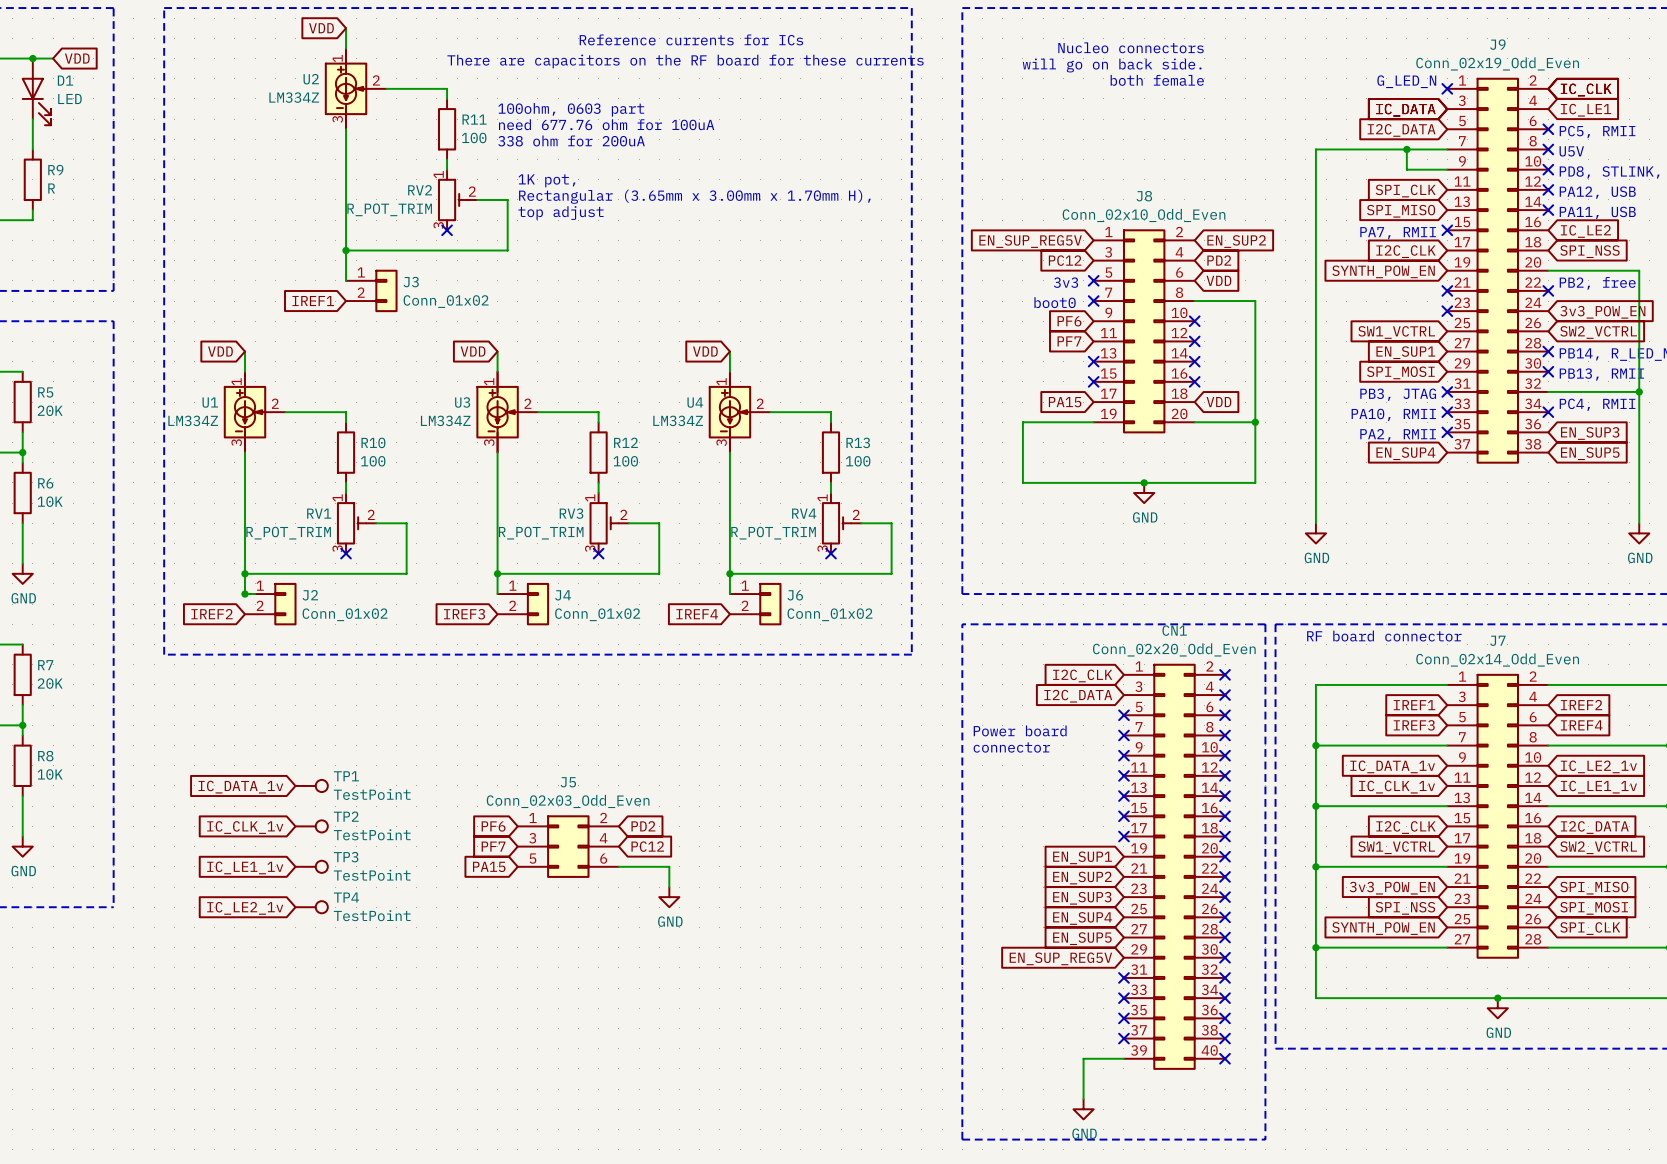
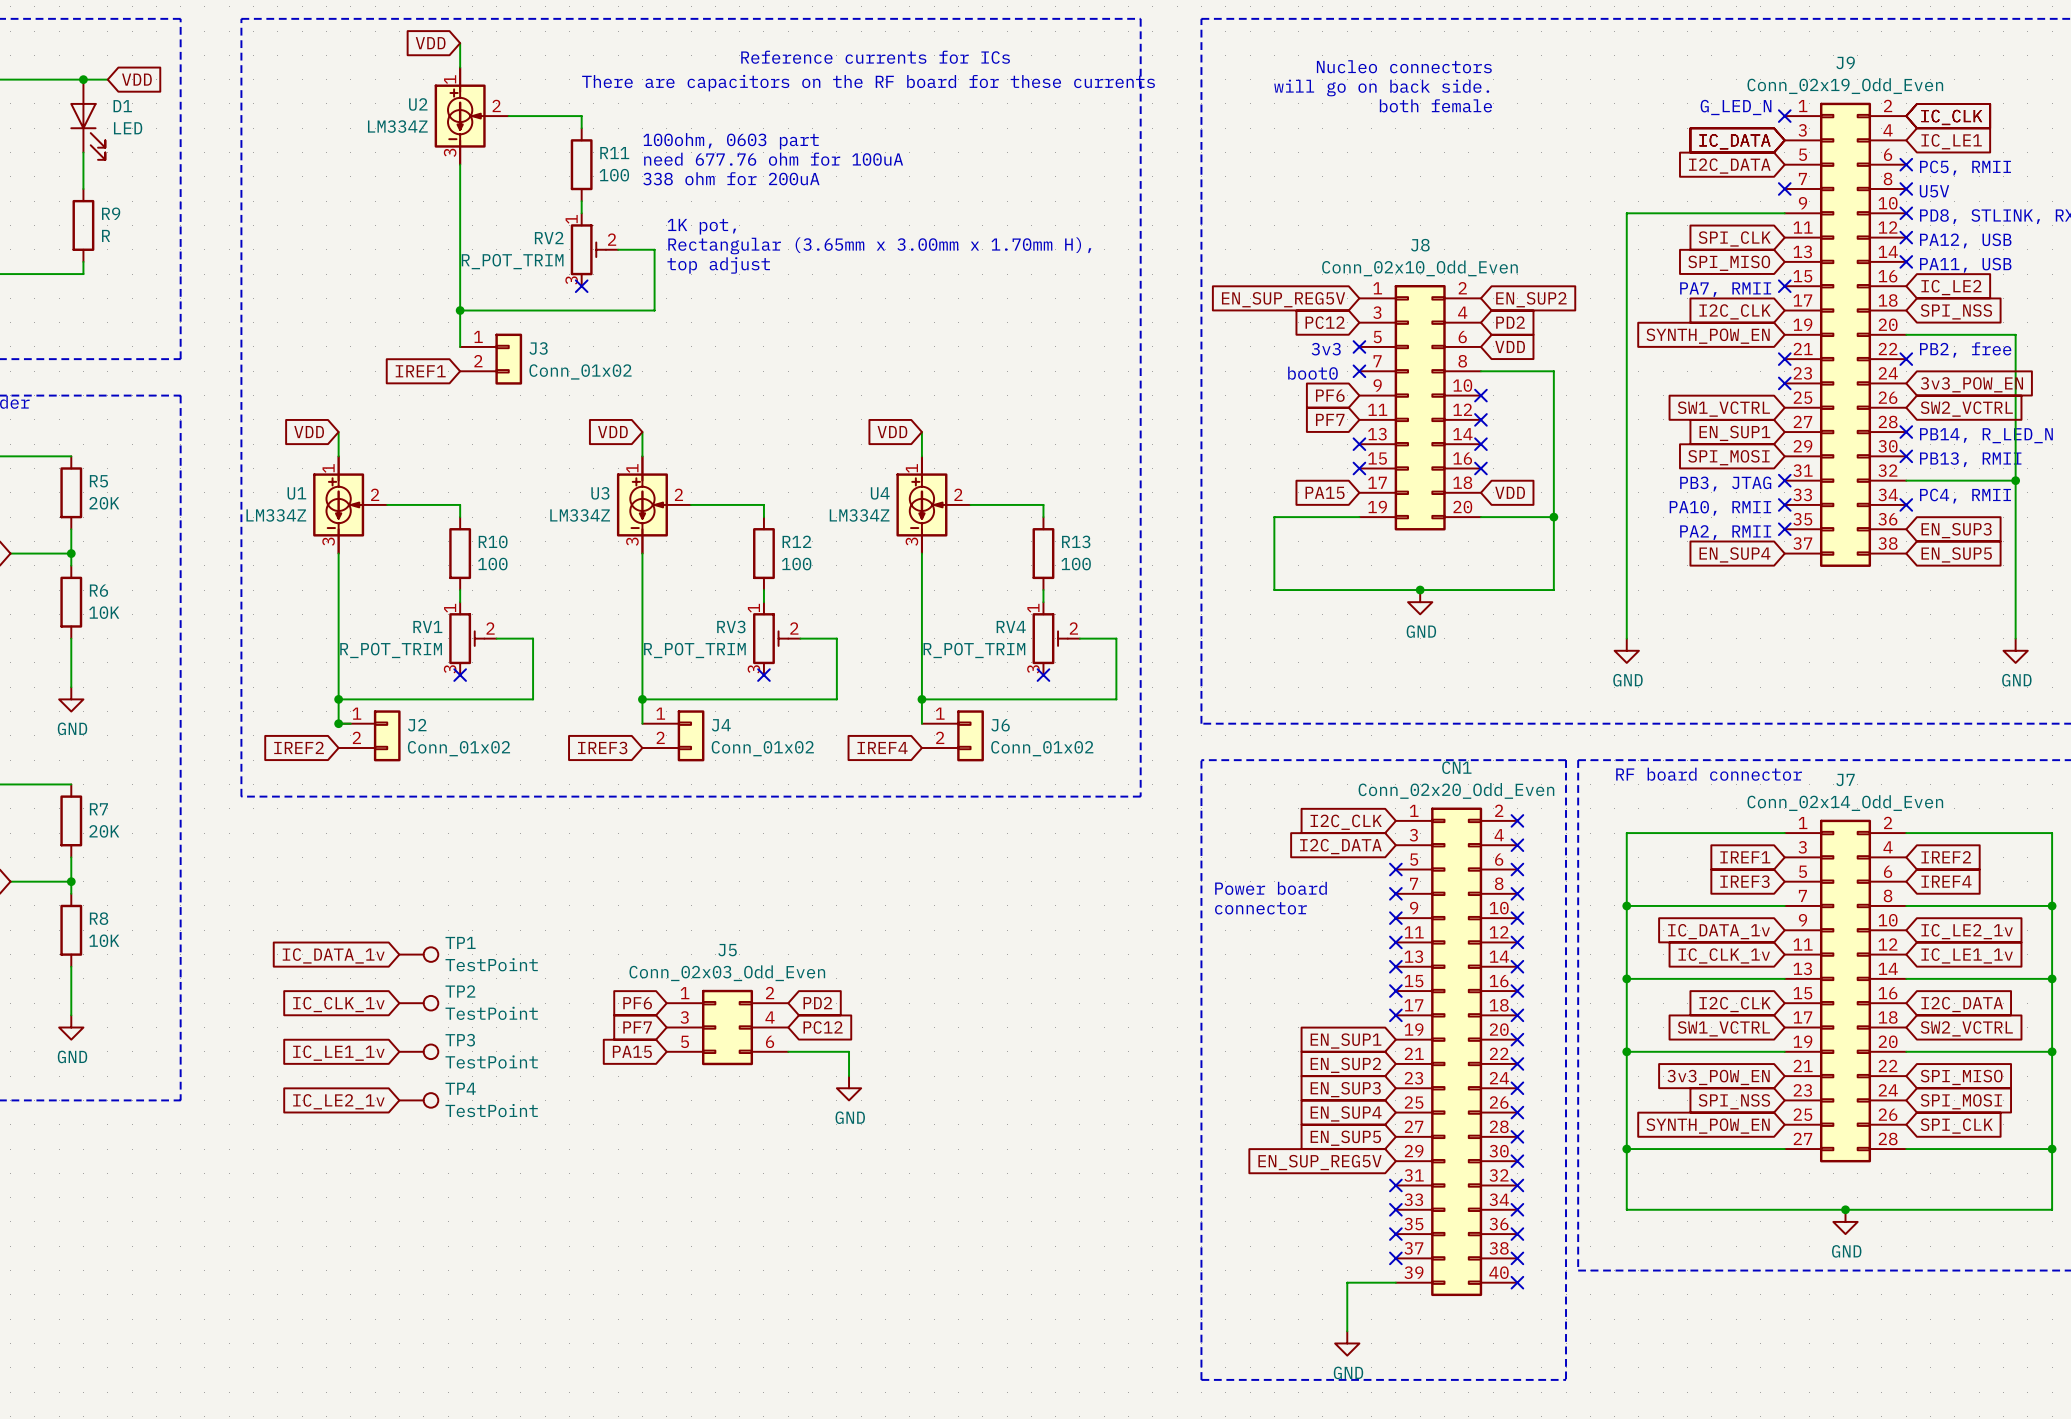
wire: (1406, 149) (1406, 169) -> none
junction: (1406, 149) -> none
wire: (1447, 149) (1315, 149) (1315, 169) -> (1736, 213) (1626, 213)
no-connect mark: none -> (1784, 188)

